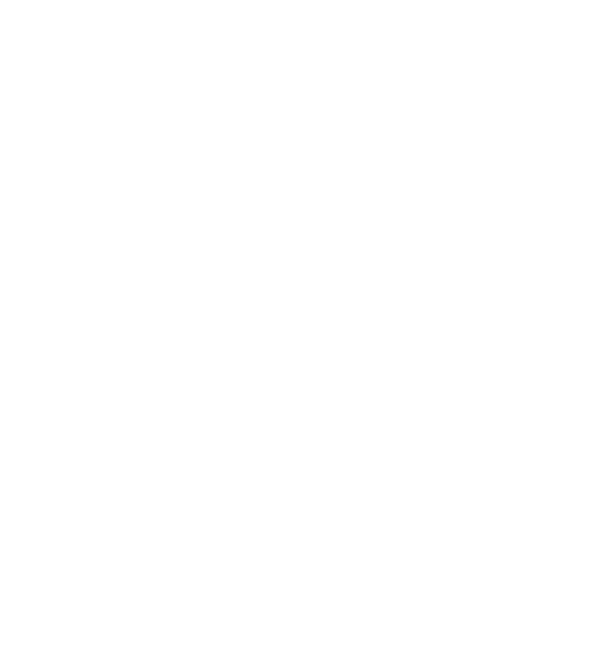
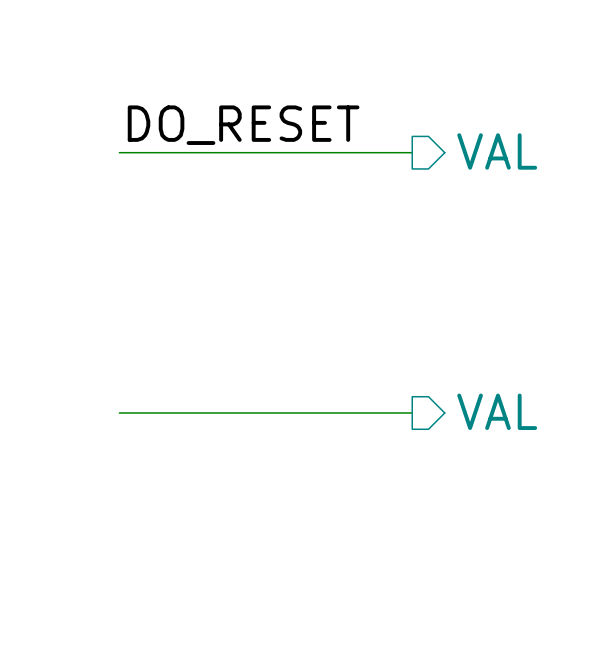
label: none -> DO_RESET (243, 125)
sheet pin: none -> VAL (497, 151)
wire: none -> (119, 152) (412, 152)
sheet pin: none -> VAL (497, 411)
wire: none -> (119, 413) (412, 413)

